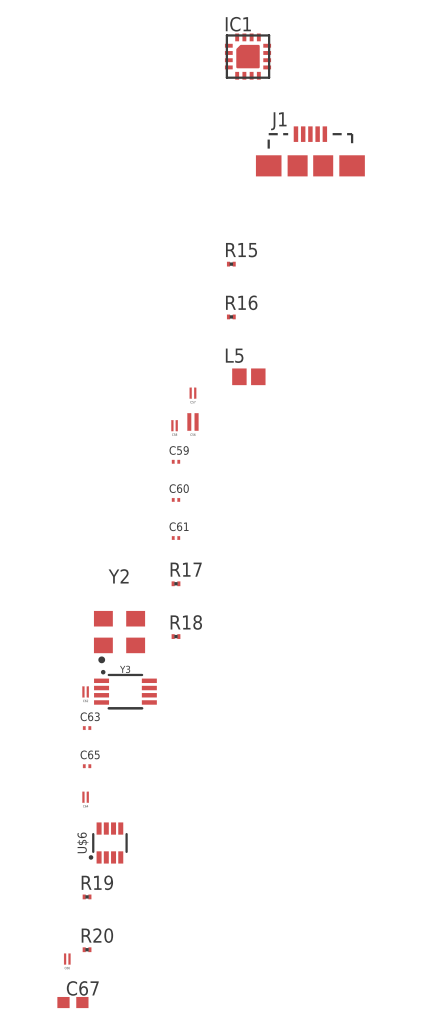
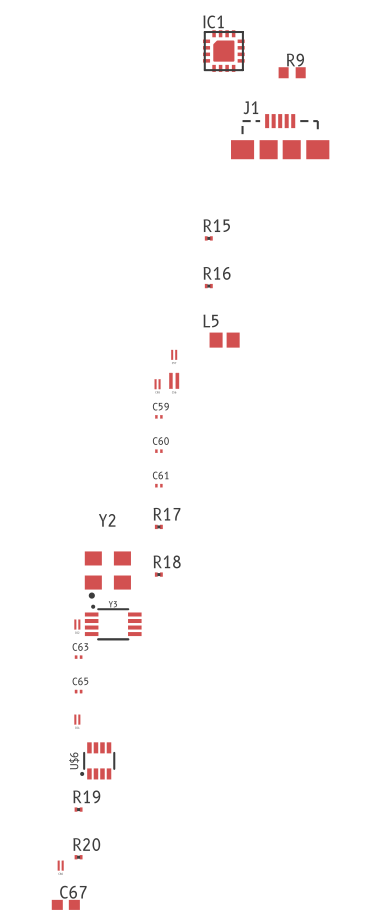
R9: none -> (292, 72)

